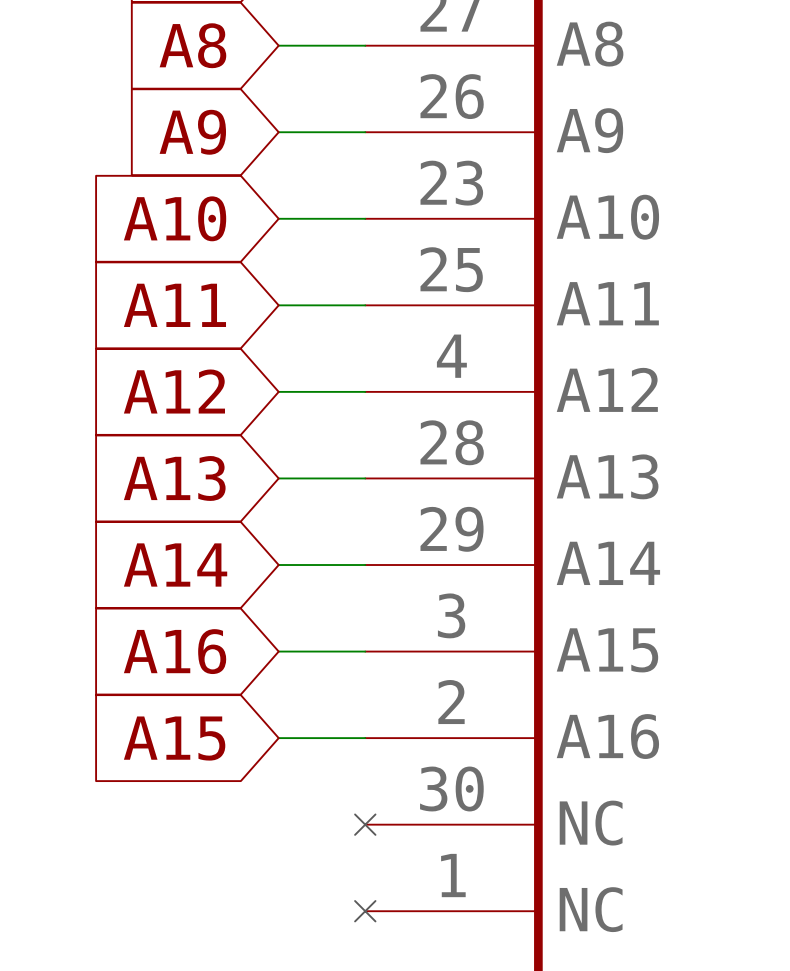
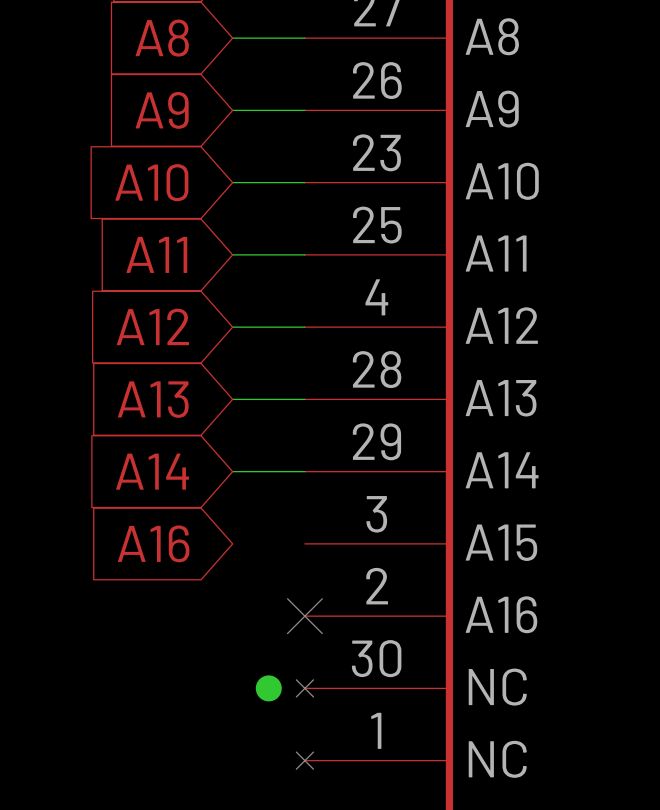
wire: (278, 651) (365, 651) -> none
global label: A15 (174, 738) -> none
wire: (278, 738) (365, 738) -> none
no-connect mark: none -> (304, 616)
junction: none -> (268, 688)

